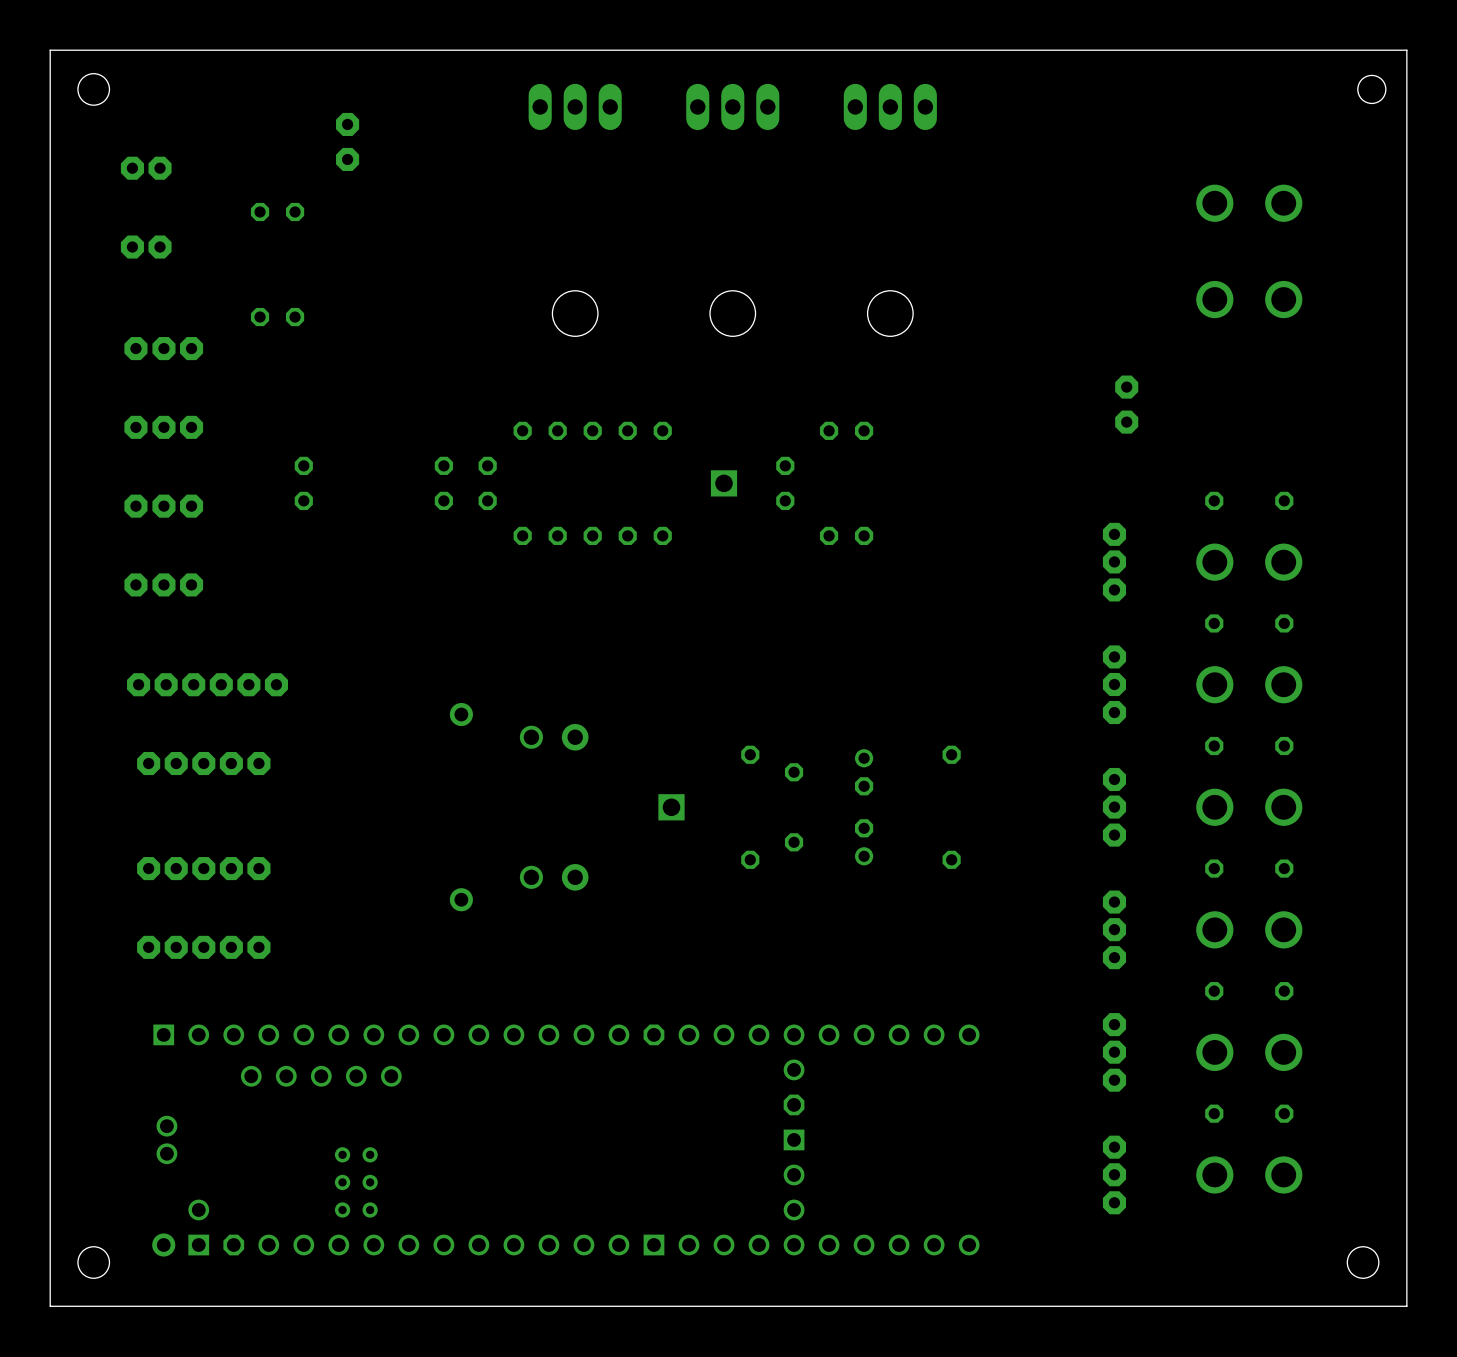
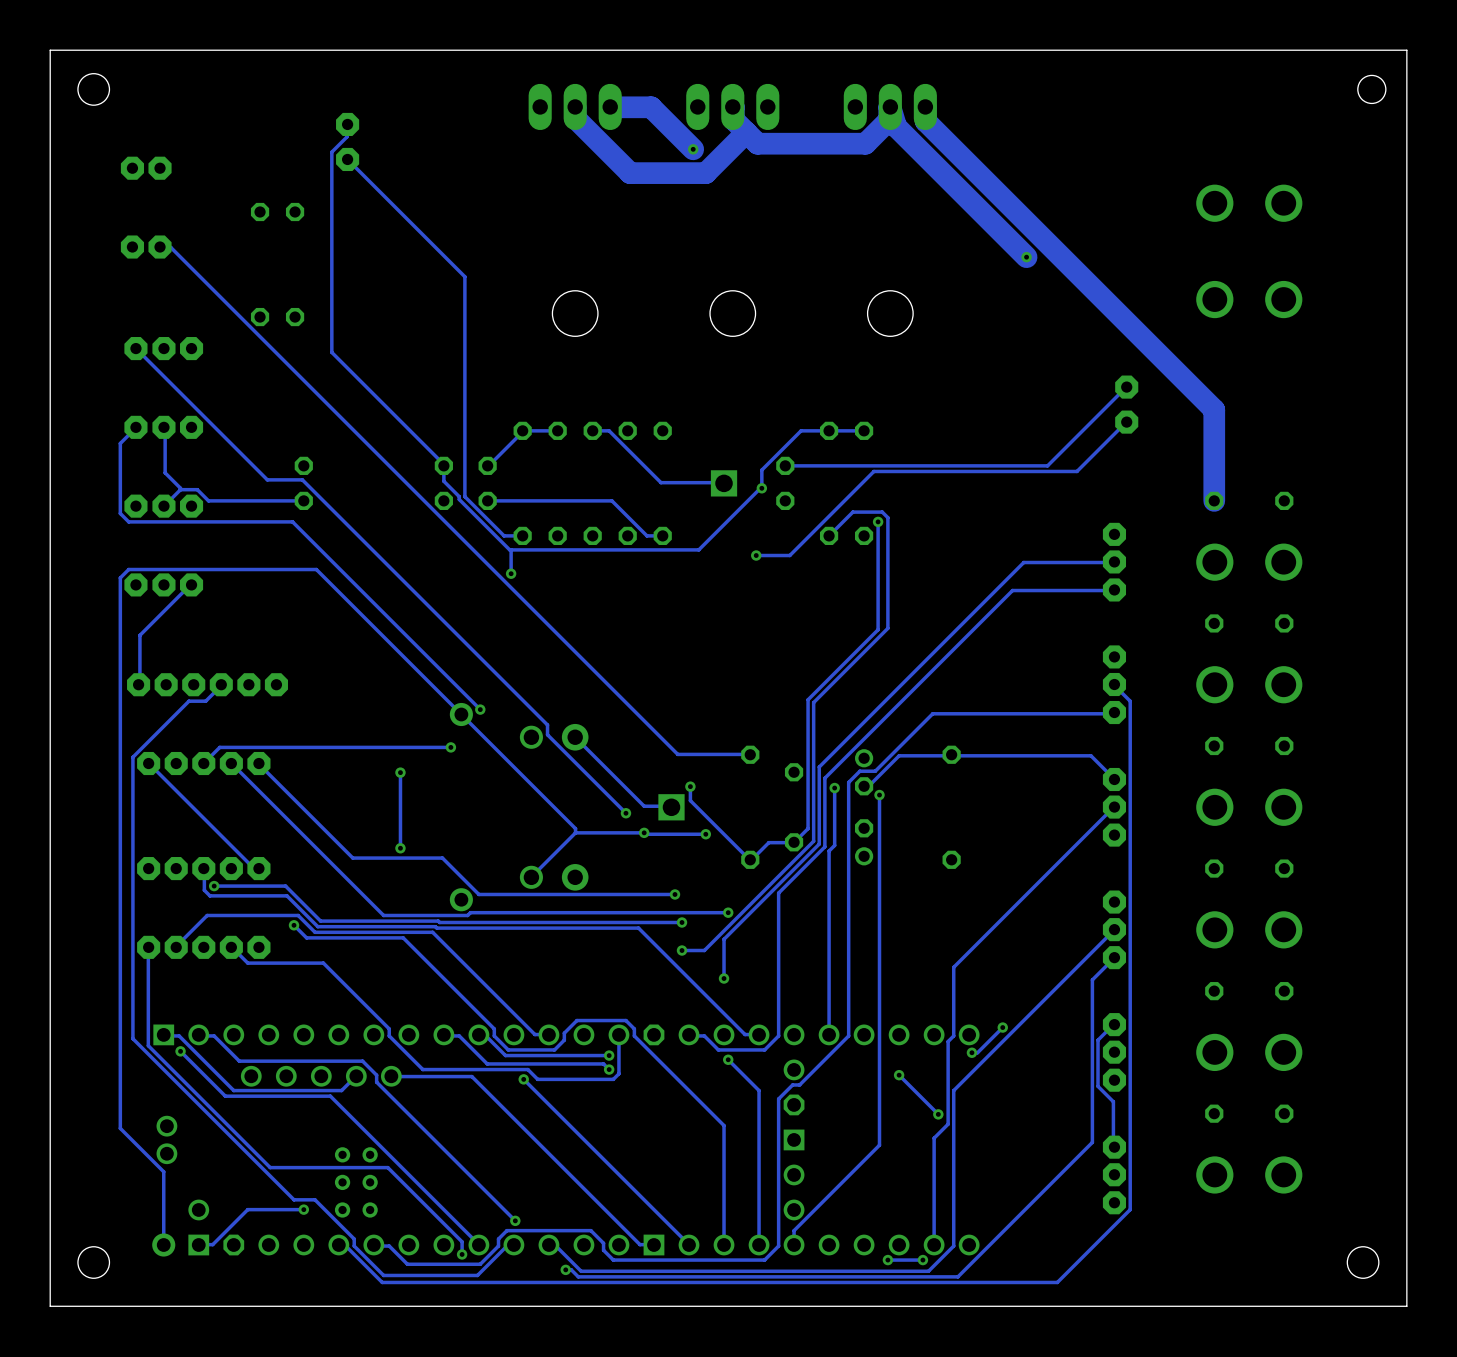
track: none -> (575, 106) (575, 118) (630, 173) (705, 173) (746, 132)
track: none -> (610, 106) (651, 107) (693, 149)
track: none -> (732, 106) (733, 119) (757, 143) (865, 143) (889, 119) (890, 106) (896, 126) (1026, 257)
track: none -> (925, 106) (925, 121) (1214, 409) (1214, 500)
track: none -> (347, 124) (347, 136) (331, 152) (331, 352) (443, 464) (443, 481) (509, 549) (698, 549) (761, 488) (761, 470) (801, 430) (864, 430)
via: none -> (693, 149)
track: none -> (347, 159) (464, 276) (464, 496) (504, 535) (522, 535)
track: none -> (160, 247) (170, 247) (677, 754) (750, 754)
via: none -> (1026, 257)
track: none -> (135, 348) (267, 479) (302, 479) (547, 725) (547, 734) (625, 813)
track: none -> (1126, 387) (1047, 465) (785, 465)
track: none -> (1126, 422) (1076, 471) (873, 471) (789, 555) (756, 555)
track: none -> (135, 427) (120, 443) (120, 513) (128, 521) (292, 521) (480, 709)
track: none -> (163, 427) (165, 472) (180, 489)
track: none -> (523, 430) (487, 465)
track: none -> (557, 430) (522, 430)
track: none -> (592, 430) (609, 430) (660, 482) (724, 483)
via: none -> (761, 488)
track: none -> (180, 489) (197, 489) (208, 500) (303, 500)
track: none -> (180, 489) (163, 506)
track: none -> (487, 500) (611, 500) (646, 535) (662, 535)
track: none -> (878, 521) (878, 629) (808, 699) (808, 828) (794, 842) (768, 842) (752, 859) (749, 859) (690, 800) (690, 786)
via: none -> (878, 521)
track: none -> (829, 535) (852, 512) (882, 512) (887, 517) (887, 628) (813, 702) (813, 841) (704, 950) (682, 950)
track: none -> (511, 549) (511, 573)
via: none -> (756, 555)
track: none -> (1114, 561) (1023, 562) (819, 767) (819, 844) (724, 939) (724, 978)
via: none -> (511, 573)
track: none -> (191, 584) (139, 635) (138, 684)
track: none -> (1114, 589) (1012, 590) (824, 778) (824, 846) (778, 893) (778, 1035) (764, 1049) (718, 1049) (704, 1035) (689, 1034)
track: none -> (221, 684) (205, 701) (188, 701) (132, 757) (132, 1038) (294, 1199) (315, 1199) (354, 1239) (354, 1246) (383, 1275) (477, 1275) (506, 1246) (513, 1245)
track: none -> (1114, 684) (1130, 701) (1130, 1209) (1057, 1282) (382, 1282) (345, 1246) (338, 1245)
via: none -> (480, 709)
track: none -> (1114, 712) (932, 713) (875, 771) (859, 771) (848, 782) (848, 1035) (799, 1084) (792, 1084) (778, 1098) (778, 1246) (764, 1260) (613, 1260) (603, 1250) (603, 1243) (590, 1230) (506, 1230) (498, 1239) (498, 1246) (480, 1264) (407, 1264) (389, 1246) (373, 1245)
track: none -> (575, 737) (644, 806) (671, 807)
track: none -> (450, 747) (219, 747) (203, 763)
via: none -> (450, 747)
track: none -> (148, 763) (253, 867) (258, 868)
track: none -> (231, 763) (383, 915) (467, 915) (470, 912) (728, 912)
track: none -> (258, 763) (352, 858) (442, 858) (478, 894) (674, 894)
track: none -> (400, 772) (400, 848)
via: none -> (400, 772)
track: none -> (1114, 779) (1091, 755) (899, 755) (869, 785) (864, 786)
via: none -> (690, 786)
track: none -> (834, 788) (834, 845) (829, 851) (829, 1034)
via: none -> (834, 788)
track: none -> (879, 795) (879, 1145) (794, 1230) (794, 1245)
via: none -> (879, 795)
track: none -> (1114, 807) (953, 967) (953, 1035) (948, 1041) (948, 1124) (934, 1138) (934, 1245)
via: none -> (625, 813)
track: none -> (575, 832) (705, 834)
track: none -> (575, 832) (531, 877)
track: none -> (575, 832) (575, 828) (316, 569) (128, 569) (120, 577) (120, 1128) (163, 1171) (163, 1245)
via: none -> (644, 832)
via: none -> (705, 834)
via: none -> (400, 848)
track: none -> (203, 868) (204, 890) (209, 895) (287, 895) (317, 926) (638, 928) (745, 1034) (759, 1034)
track: none -> (214, 886) (285, 886) (320, 921) (682, 922)
via: none -> (214, 886)
via: none -> (674, 894)
via: none -> (728, 912)
via: none -> (682, 922)
track: none -> (294, 925) (306, 937) (403, 937) (494, 1028) (494, 1035) (508, 1049) (554, 1049) (564, 1040) (564, 1033) (576, 1020) (625, 1020) (634, 1028) (634, 1035) (724, 1125) (724, 1245)
via: none -> (294, 925)
track: none -> (1114, 929) (953, 1090) (953, 1246) (928, 1271) (581, 1271) (555, 1246) (548, 1245)
track: none -> (148, 947) (148, 1045) (270, 1167) (387, 1167) (462, 1241) (462, 1254)
track: none -> (176, 947) (207, 915) (298, 915) (315, 932) (432, 932) (534, 1034) (548, 1034)
track: none -> (231, 947) (247, 963) (323, 963) (389, 1028) (389, 1035) (422, 1069) (527, 1069) (537, 1079) (613, 1079) (618, 1073) (618, 1034)
via: none -> (682, 950)
track: none -> (1114, 957) (1092, 979) (1092, 1142) (957, 1276) (578, 1276) (571, 1269) (565, 1269)
via: none -> (724, 978)
track: none -> (1114, 1024) (1098, 1040) (1098, 1086) (1113, 1101) (1114, 1147)
track: none -> (1002, 1027) (977, 1052) (971, 1052)
via: none -> (1002, 1027)
track: none -> (163, 1034) (179, 1035) (233, 1090) (341, 1090) (356, 1076)
track: none -> (198, 1034) (214, 1035) (239, 1061) (362, 1061) (376, 1075) (376, 1082) (515, 1220)
track: none -> (443, 1034) (459, 1035) (487, 1063) (603, 1063) (609, 1069)
track: none -> (478, 1034) (485, 1035) (505, 1055) (609, 1055)
track: none -> (180, 1051) (225, 1096) (330, 1096) (478, 1245)
via: none -> (180, 1051)
via: none -> (971, 1052)
via: none -> (609, 1055)
track: none -> (728, 1059) (759, 1090) (759, 1245)
via: none -> (728, 1059)
via: none -> (609, 1069)
track: none -> (899, 1075) (938, 1114)
via: none -> (899, 1075)
track: none -> (391, 1076) (471, 1076) (639, 1244) (653, 1245)
track: none -> (523, 1079) (689, 1245)
via: none -> (523, 1079)
via: none -> (938, 1114)
track: none -> (303, 1209) (247, 1209) (212, 1244) (198, 1245)
via: none -> (303, 1209)
via: none -> (515, 1220)
via: none -> (462, 1254)
via: none -> (887, 1260)
track: none -> (922, 1260) (887, 1260)
via: none -> (922, 1260)
via: none -> (565, 1269)

